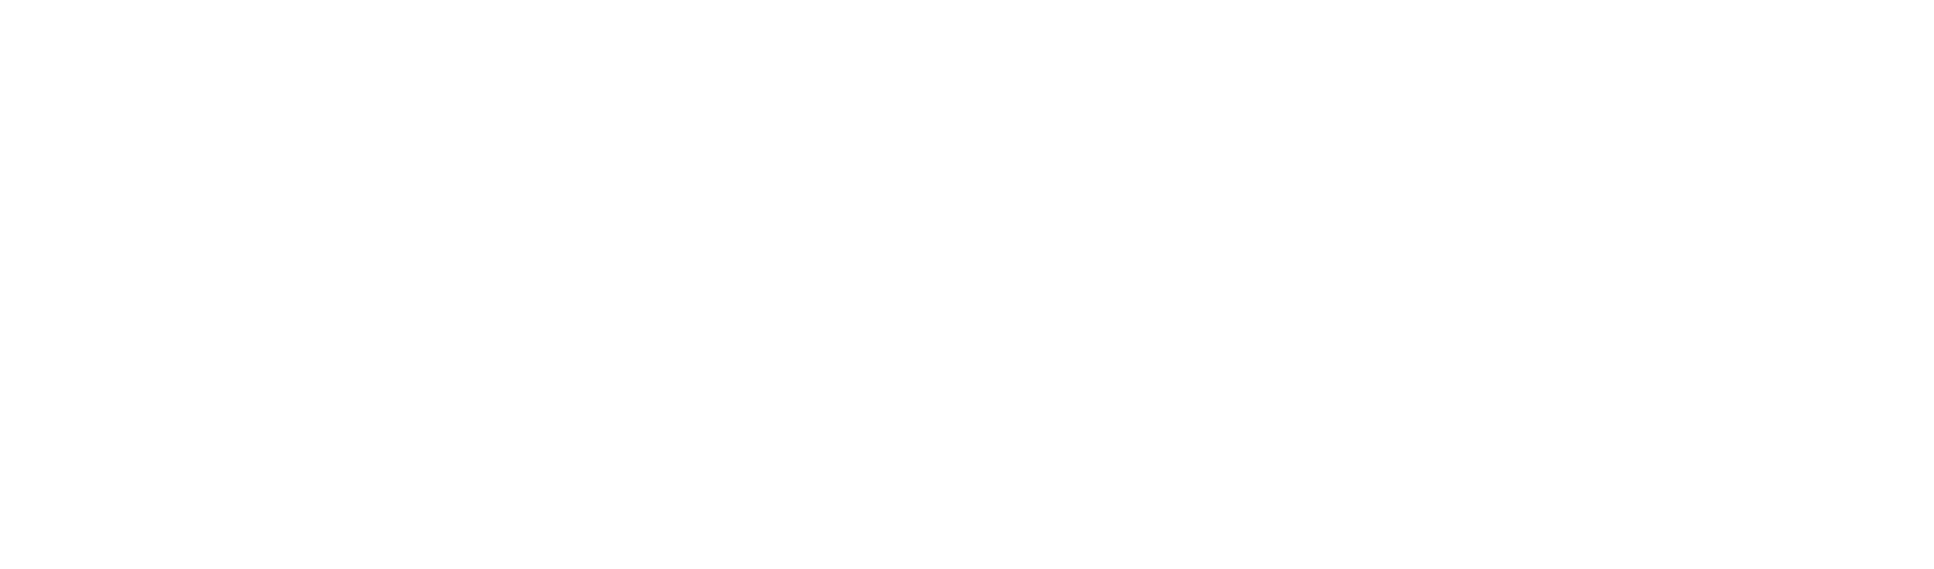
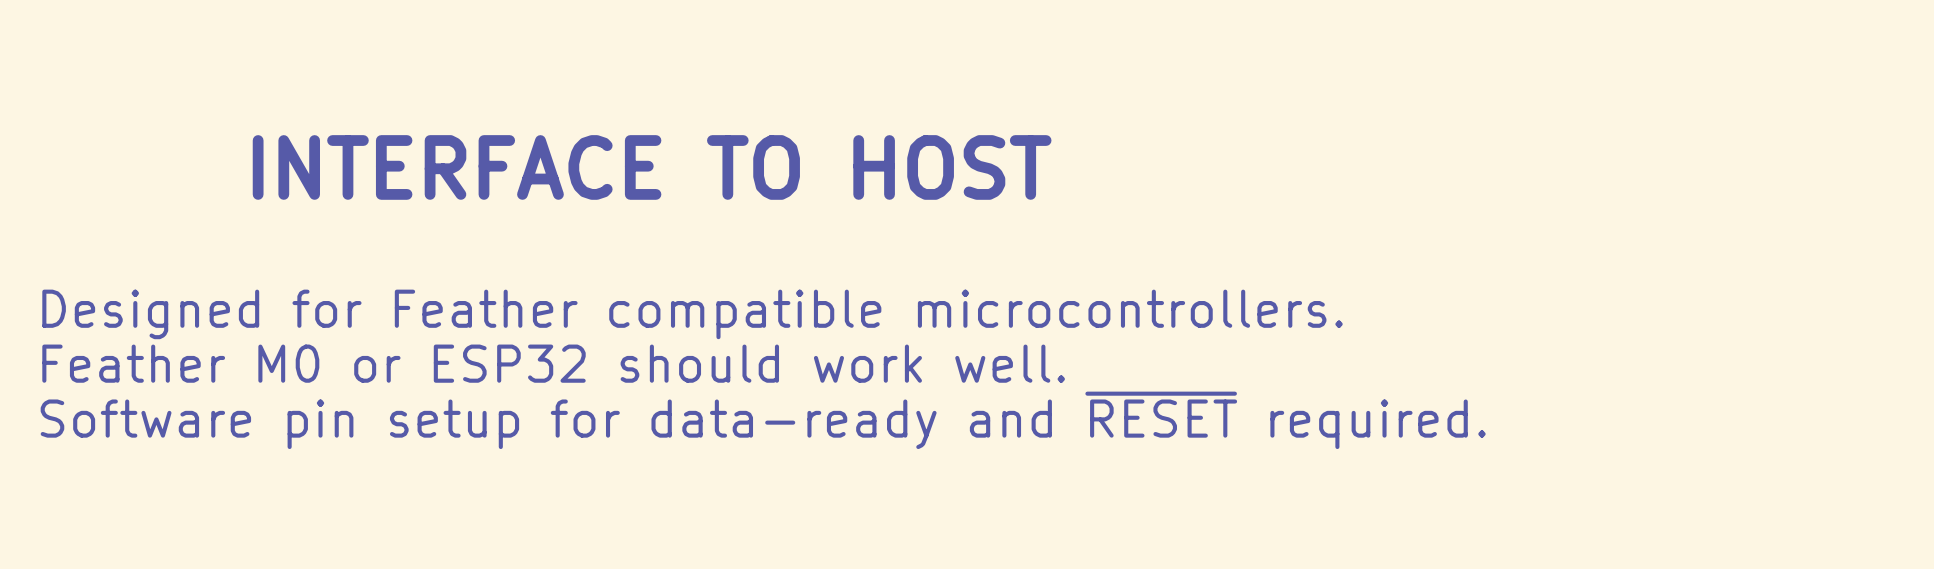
text: none -> INTERFACE TO HOST (652, 167)
text: none -> Designed for Feather compatible microcontrollers. (692, 314)
text: none -> Feather M0 or ESP32 should work well. (553, 363)
text: none -> Software pin setup for data-ready and ~{RESET} required. (763, 420)

